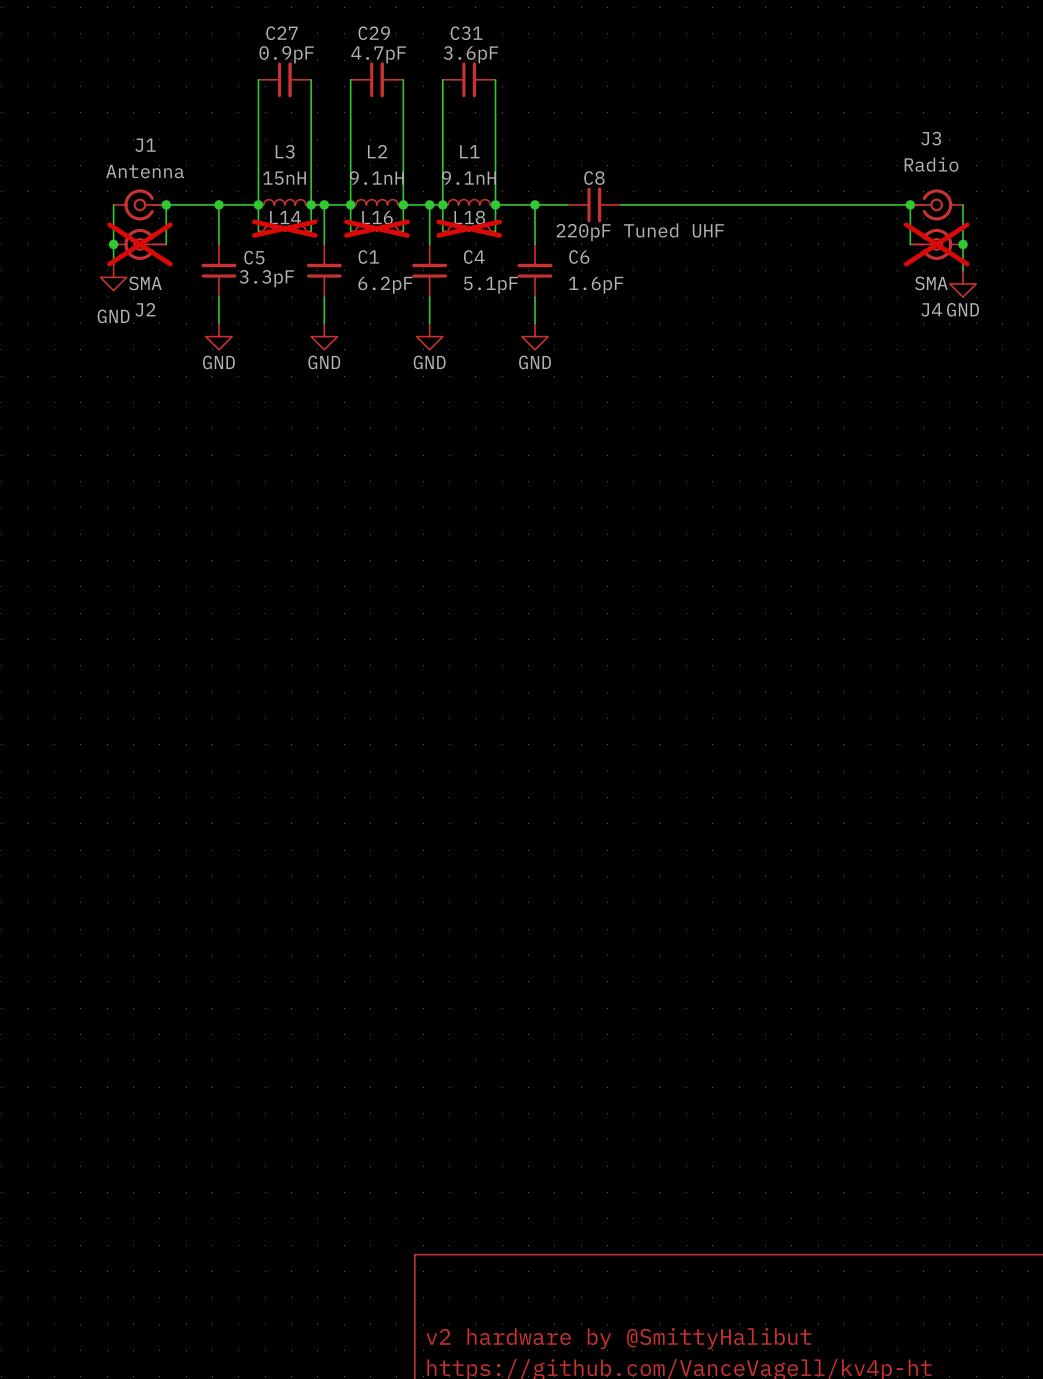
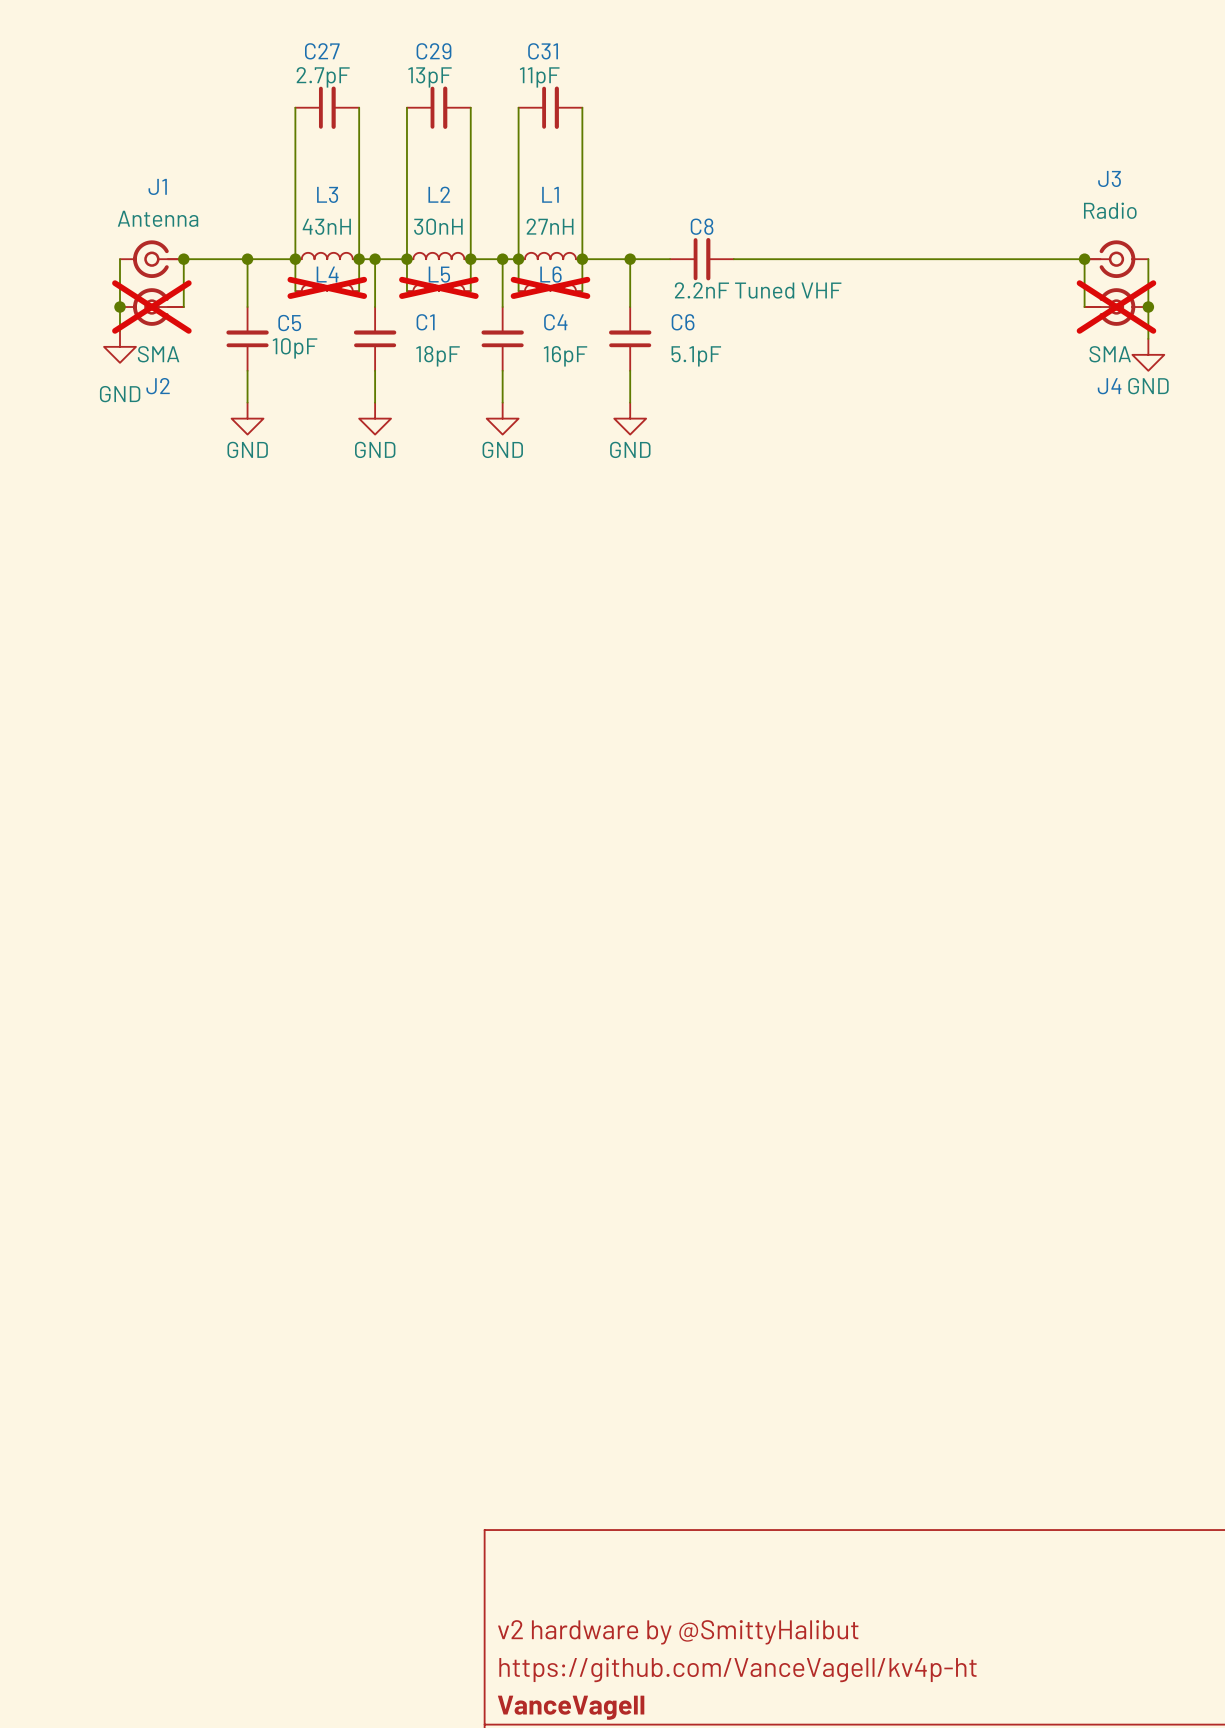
C27 value: 0.9pF (286, 54) -> 2.7pF (323, 77)
C29 value: 4.7pF (378, 54) -> 13pF (430, 77)
C31 value: 3.6pF (470, 54) -> 11pF (539, 77)
L3 value: 15nH (284, 178) -> 43nH (326, 226)
L2 value: 9.1nH (376, 178) -> 30nH (438, 226)
L1 value: 9.1nH (469, 178) -> 27nH (550, 226)
L14 name: L14 (285, 217) -> L4 (327, 274)
L16 name: L16 (377, 217) -> L5 (439, 274)
L18 name: L18 (469, 217) -> L6 (550, 274)
C8 value: 220pF Tuned UHF (640, 232) -> 2.2nF Tuned VHF (758, 290)
C5 value: 3.3pF (266, 278) -> 10pF (295, 348)
C1 value: 6.2pF (385, 285) -> 18pF (438, 356)
C4 value: 5.1pF (490, 285) -> 16pF (565, 356)
C6 value: 1.6pF (596, 285) -> 5.1pF (696, 356)

